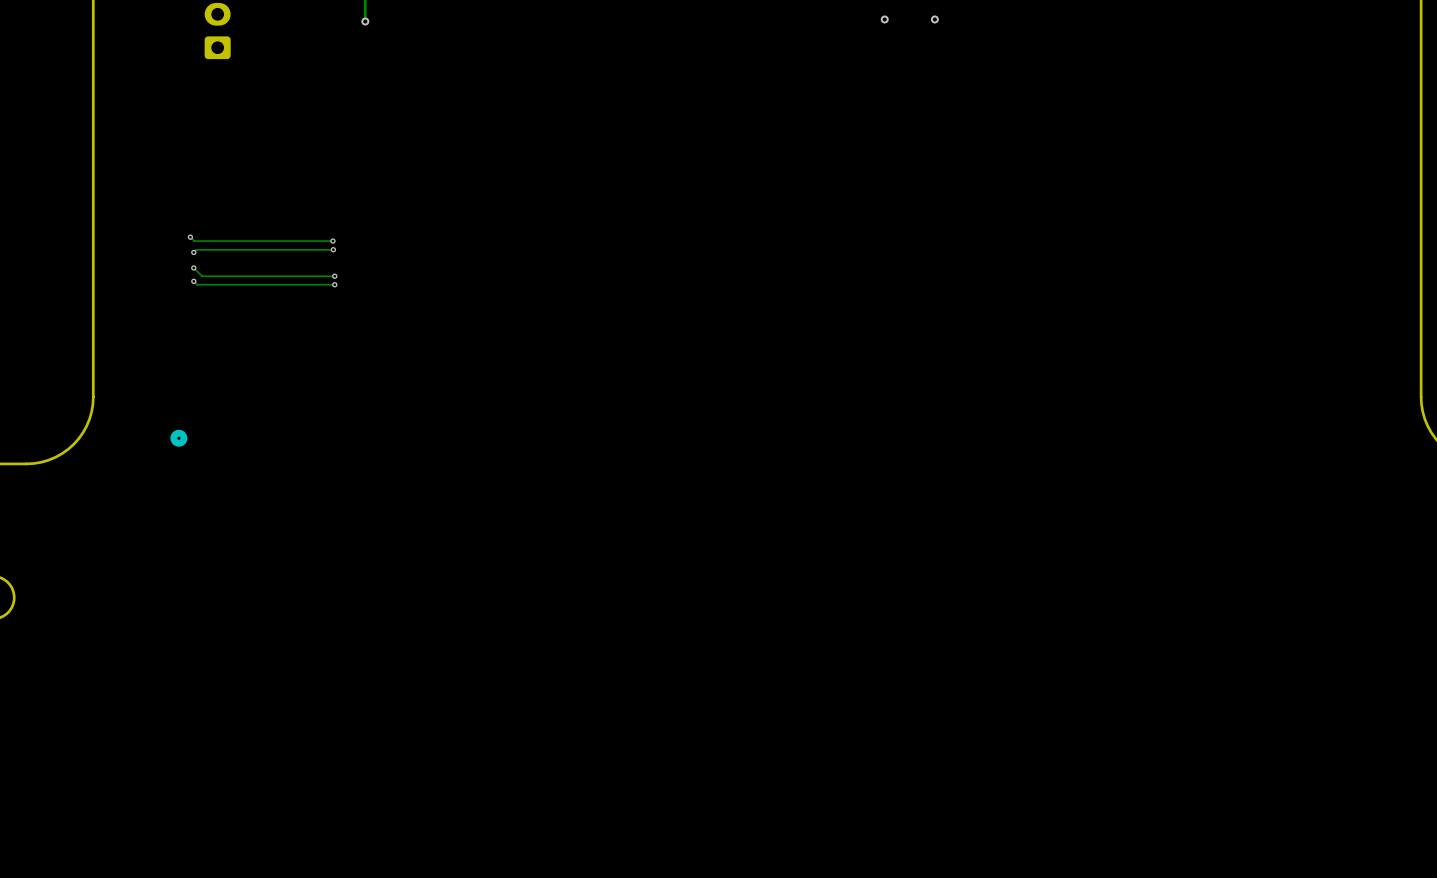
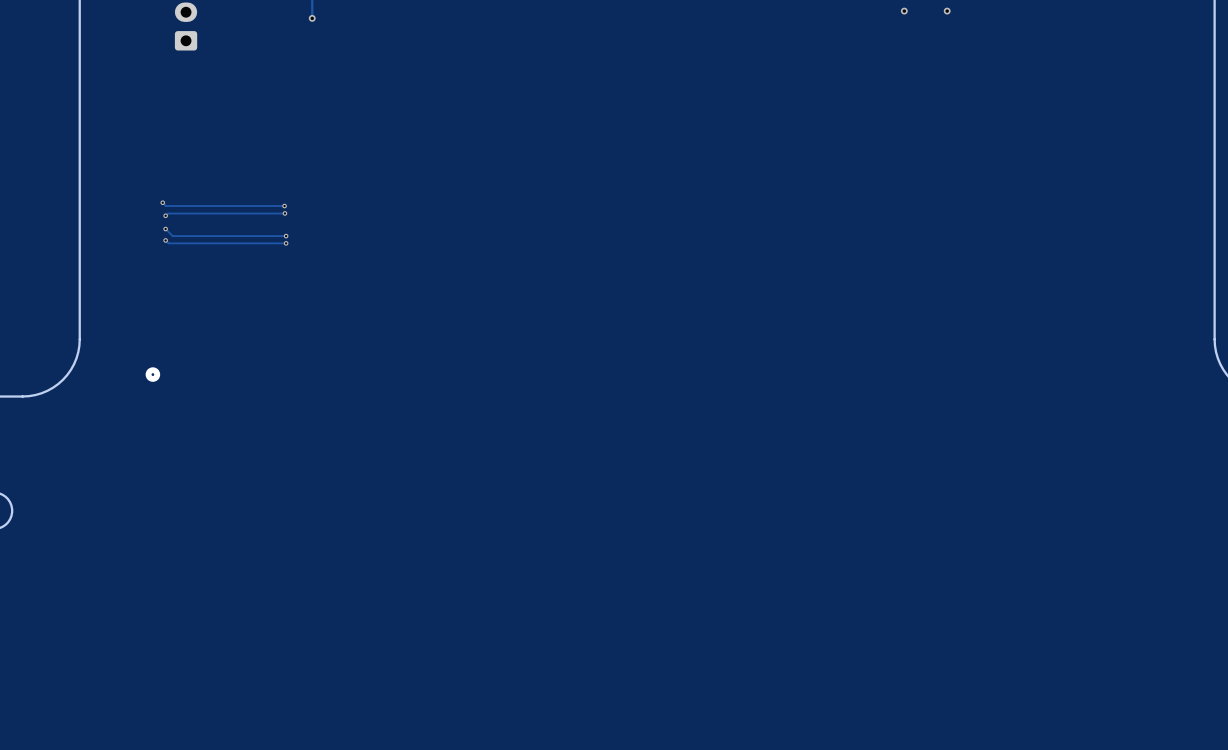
via: none -> (904, 11)
via: none -> (947, 11)
via: (884, 19) -> none
via: (934, 19) -> none

